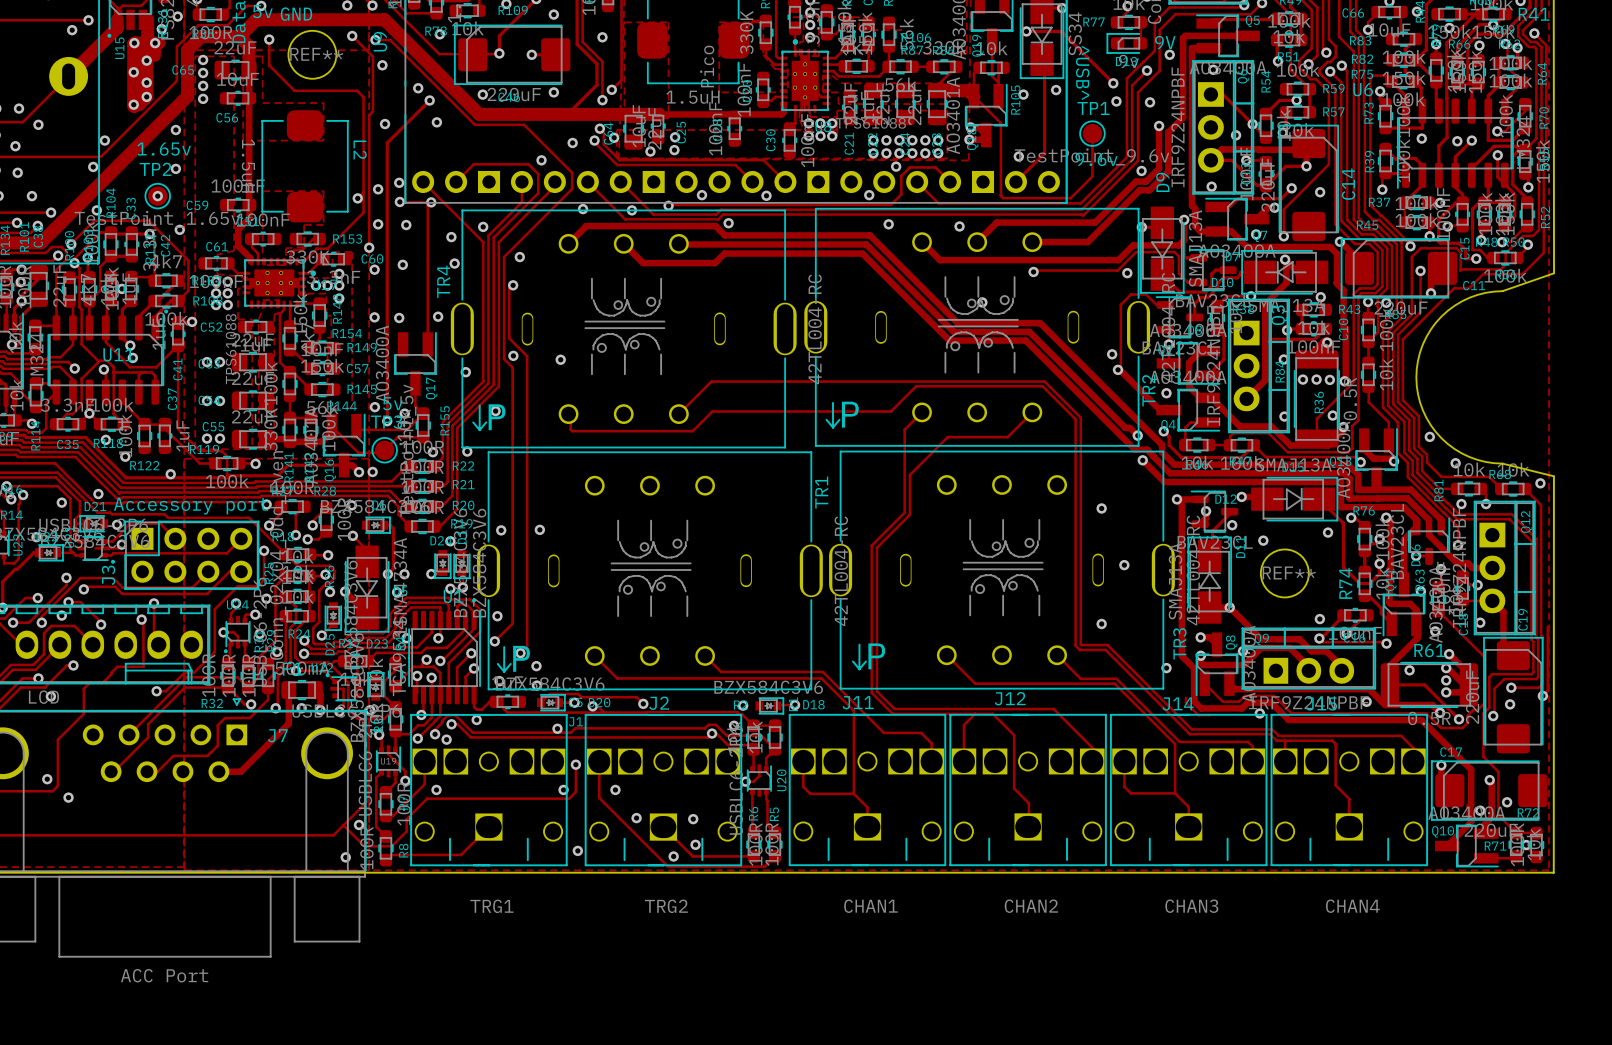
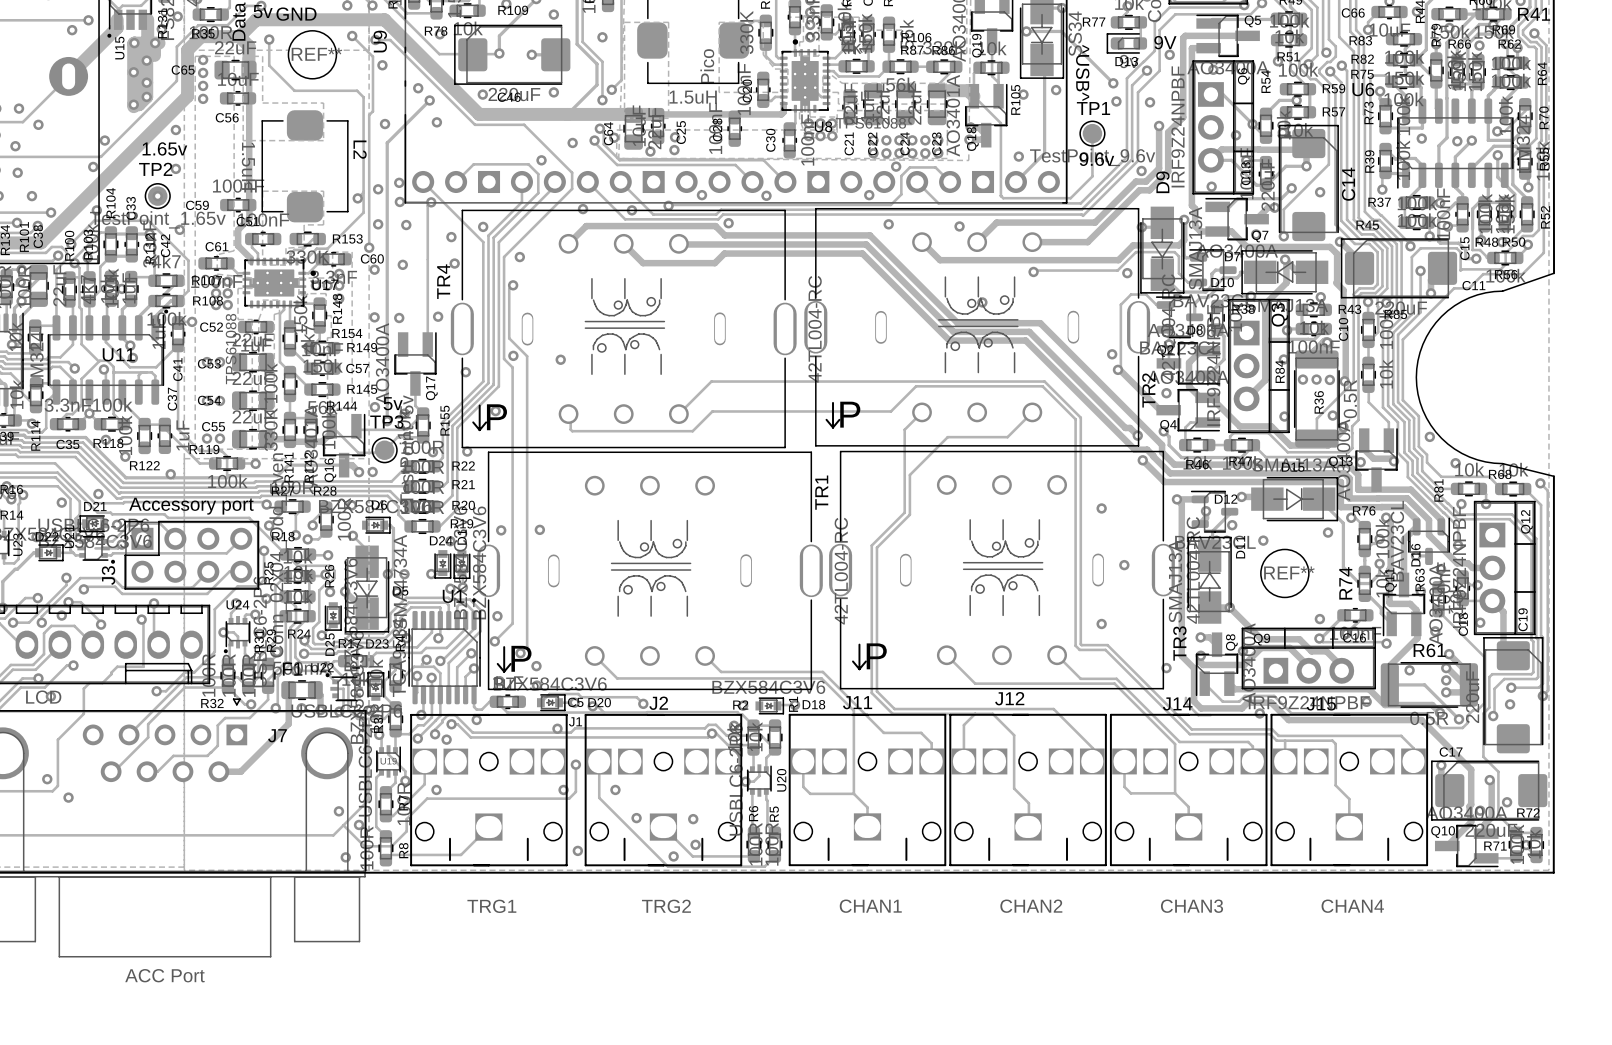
track: none -> (1540, 483) (1547, 490) (1547, 626)
via: none -> (338, 811)

